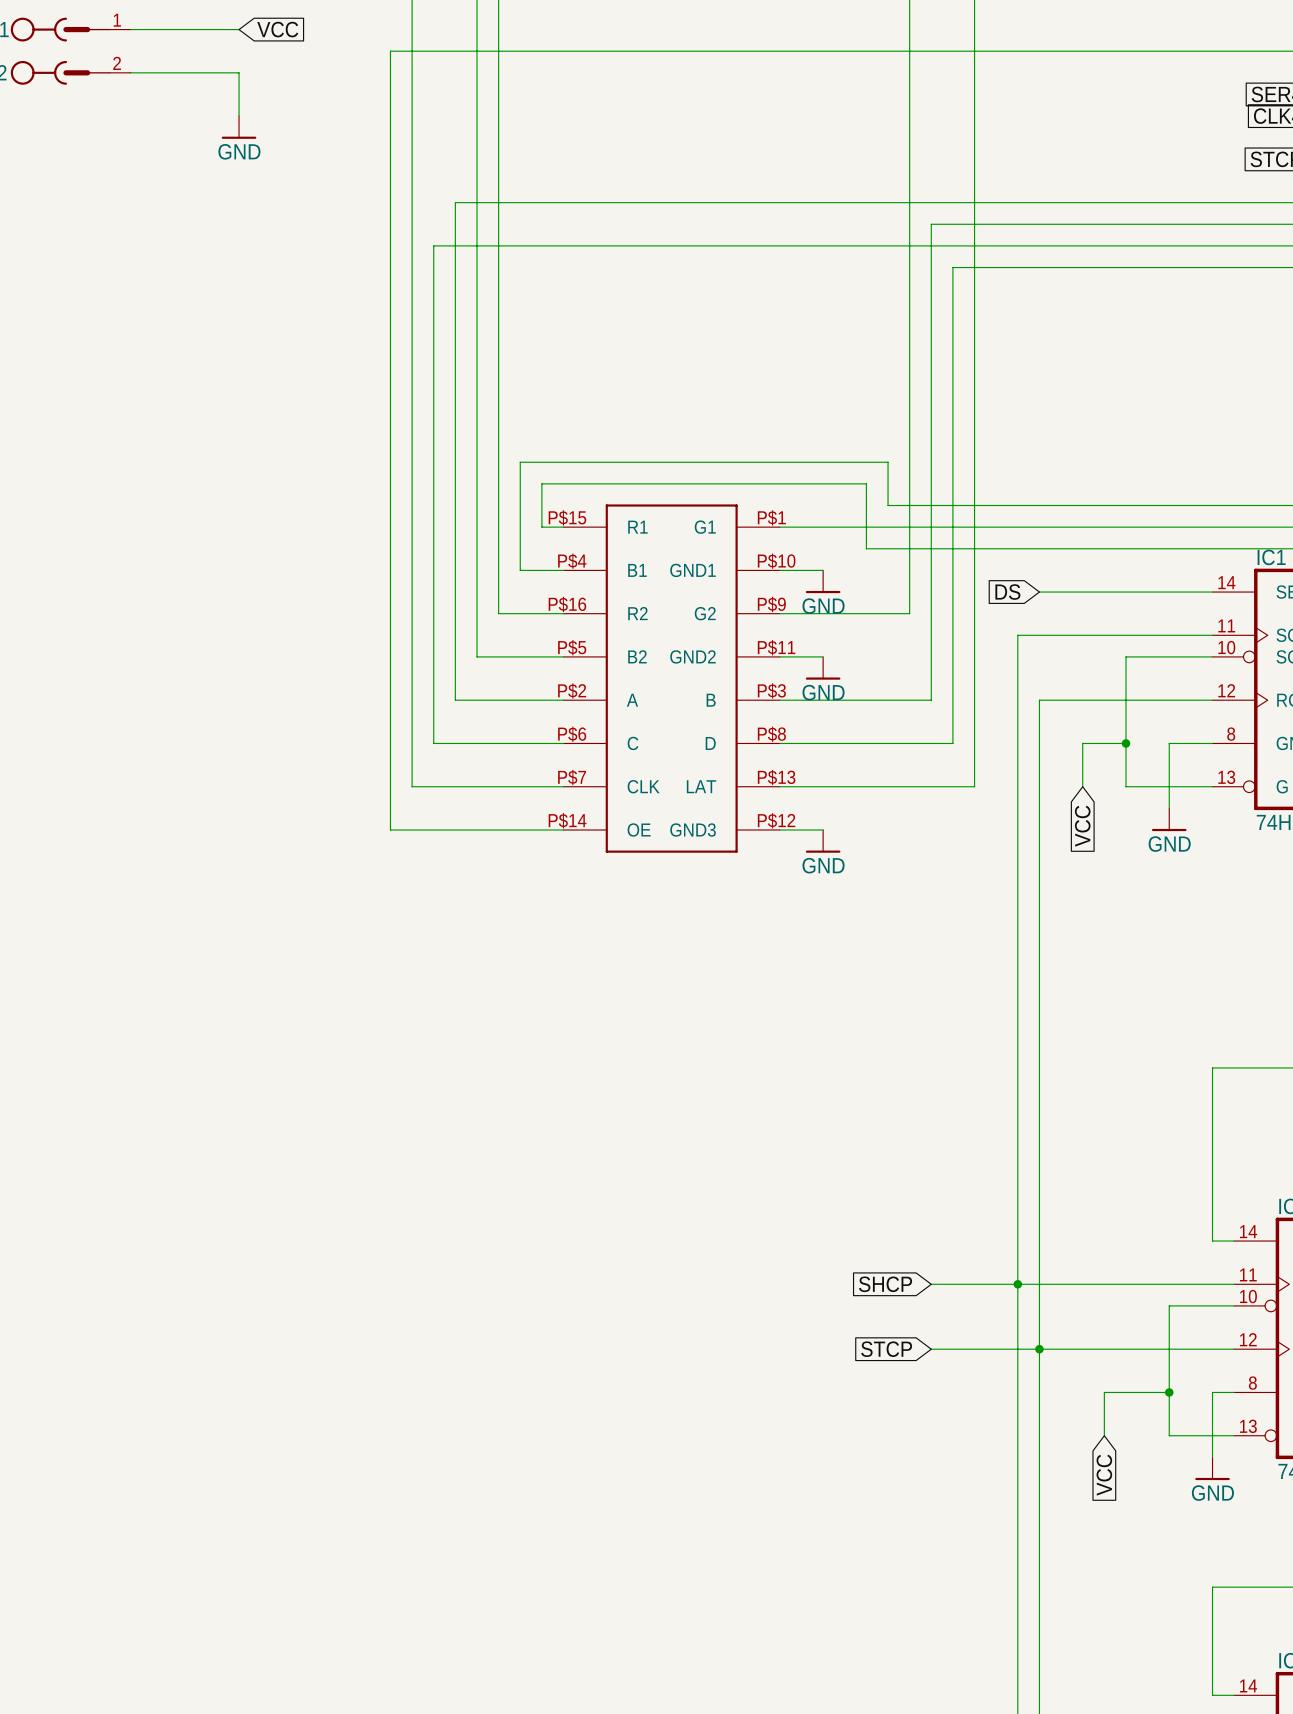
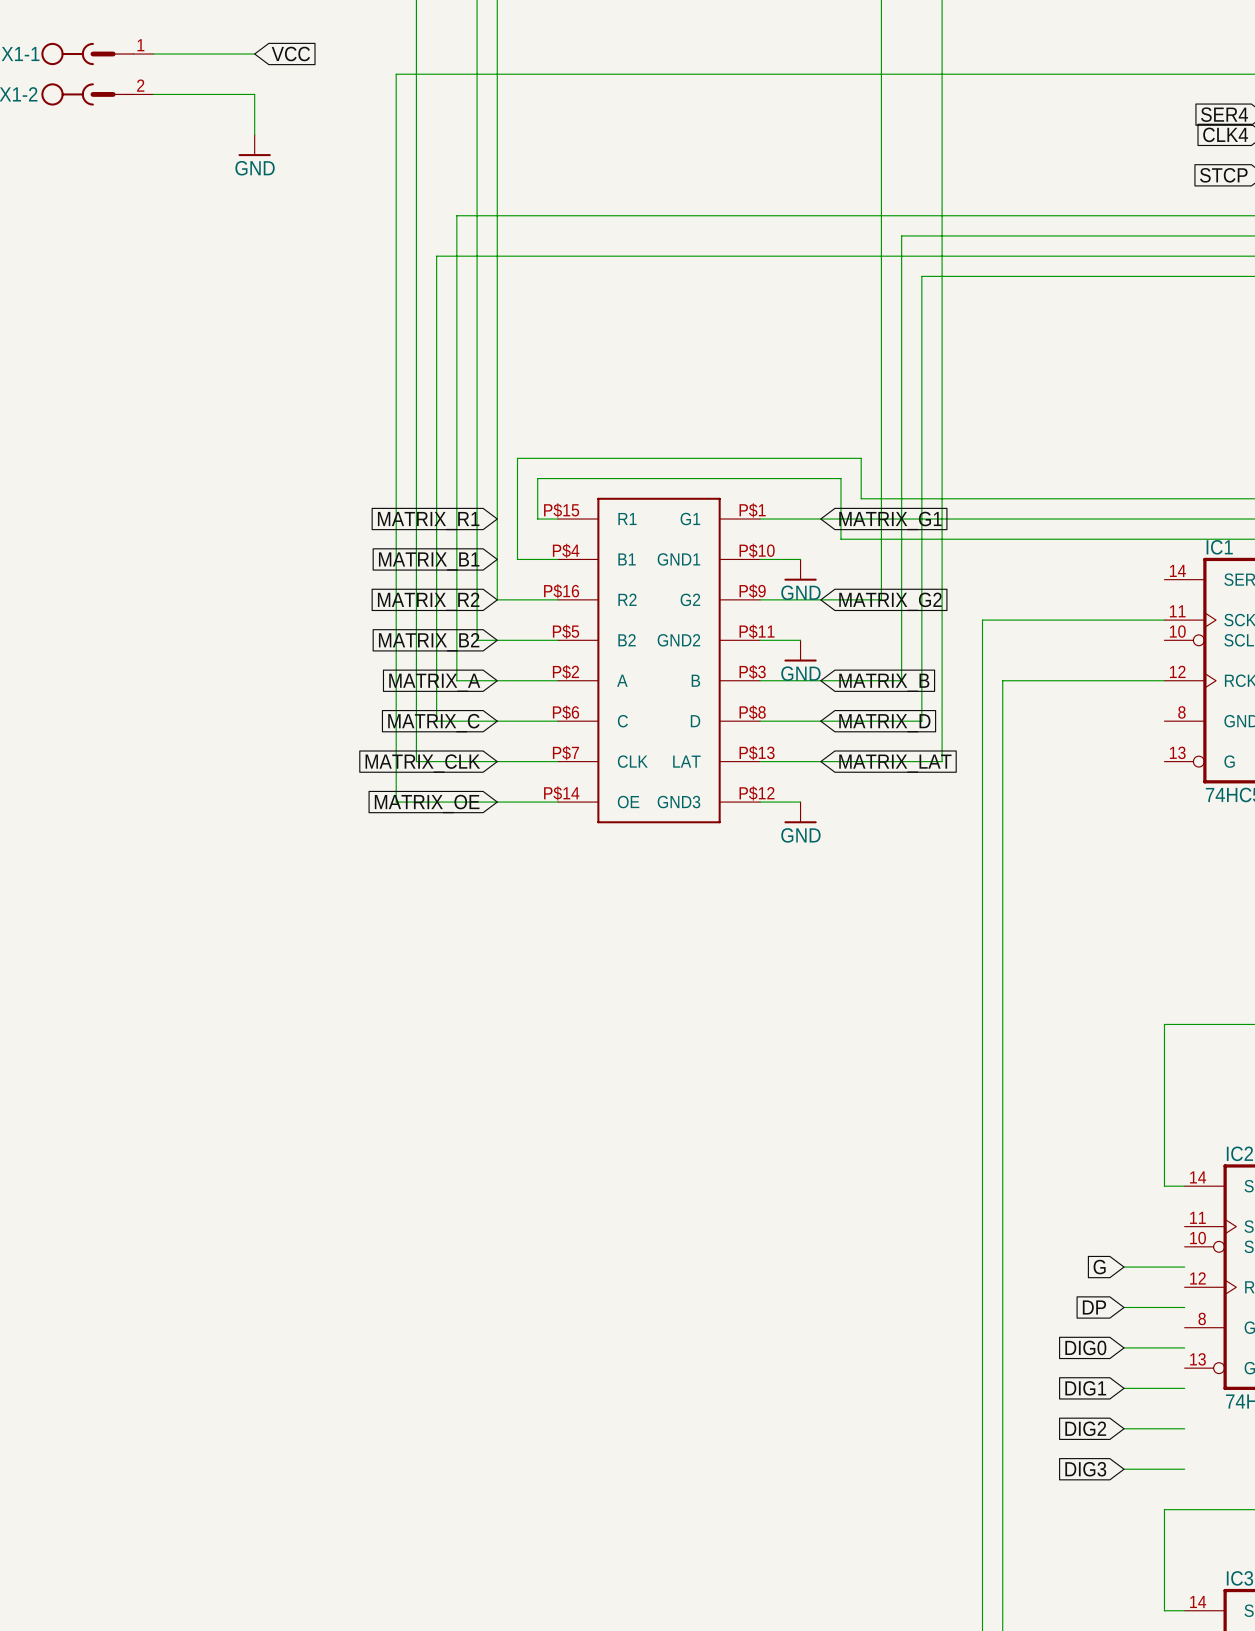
global label: none -> MATRIX_R1 (428, 521)
global label: none -> MATRIX_G1 (890, 520)
global label: none -> MATRIX_B1 (429, 561)
global label: DS (1007, 592) -> none
wire: (1039, 592) (1212, 592) -> none
global label: none -> MATRIX_R2 (428, 601)
global label: none -> MATRIX_G2 (890, 601)
wire: (1212, 656) (1125, 656) (1125, 786) (1212, 786) -> none
global label: none -> MATRIX_B2 (429, 642)
global label: none -> MATRIX_A (434, 682)
global label: none -> MATRIX_B (884, 682)
wire: (1125, 743) (1082, 743) (1082, 786) -> none
junction: (1125, 743) -> none
wire: (1212, 743) (1169, 743) (1169, 808) -> none
global label: none -> MATRIX_C (433, 723)
global label: none -> MATRIX_D (884, 723)
global label: none -> MATRIX_CLK (422, 763)
global label: none -> MATRIX_LAT (895, 763)
power symbol: GND (1169, 819) -> none
global label: VCC (1082, 826) -> none
global label: none -> MATRIX_OE (427, 803)
global label: SHCP (885, 1284) -> none
wire: (931, 1284) (1234, 1284) -> none
junction: (1017, 1284) -> none
wire: (1234, 1305) (1169, 1305) (1169, 1435) (1234, 1435) -> none
global label: none -> G (1099, 1267)
wire: none -> (1124, 1267) (1184, 1267)
global label: STCP (886, 1349) -> none
wire: (931, 1349) (1234, 1349) -> none
junction: (1039, 1349) -> none
global label: none -> DP (1094, 1307)
wire: none -> (1124, 1307) (1184, 1307)
wire: (1169, 1392) (1104, 1392) (1104, 1435) -> none
junction: (1169, 1392) -> none
wire: (1234, 1392) (1212, 1392) (1212, 1457) -> none
global label: none -> DIG0 (1085, 1347)
wire: none -> (1124, 1347) (1184, 1347)
global label: none -> DIG1 (1085, 1388)
wire: none -> (1124, 1388) (1184, 1388)
power symbol: GND (1212, 1468) -> none
global label: VCC (1104, 1475) -> none
global label: none -> DIG2 (1085, 1428)
wire: none -> (1124, 1428) (1184, 1428)
global label: none -> DIG3 (1085, 1469)
wire: none -> (1124, 1469) (1184, 1469)

